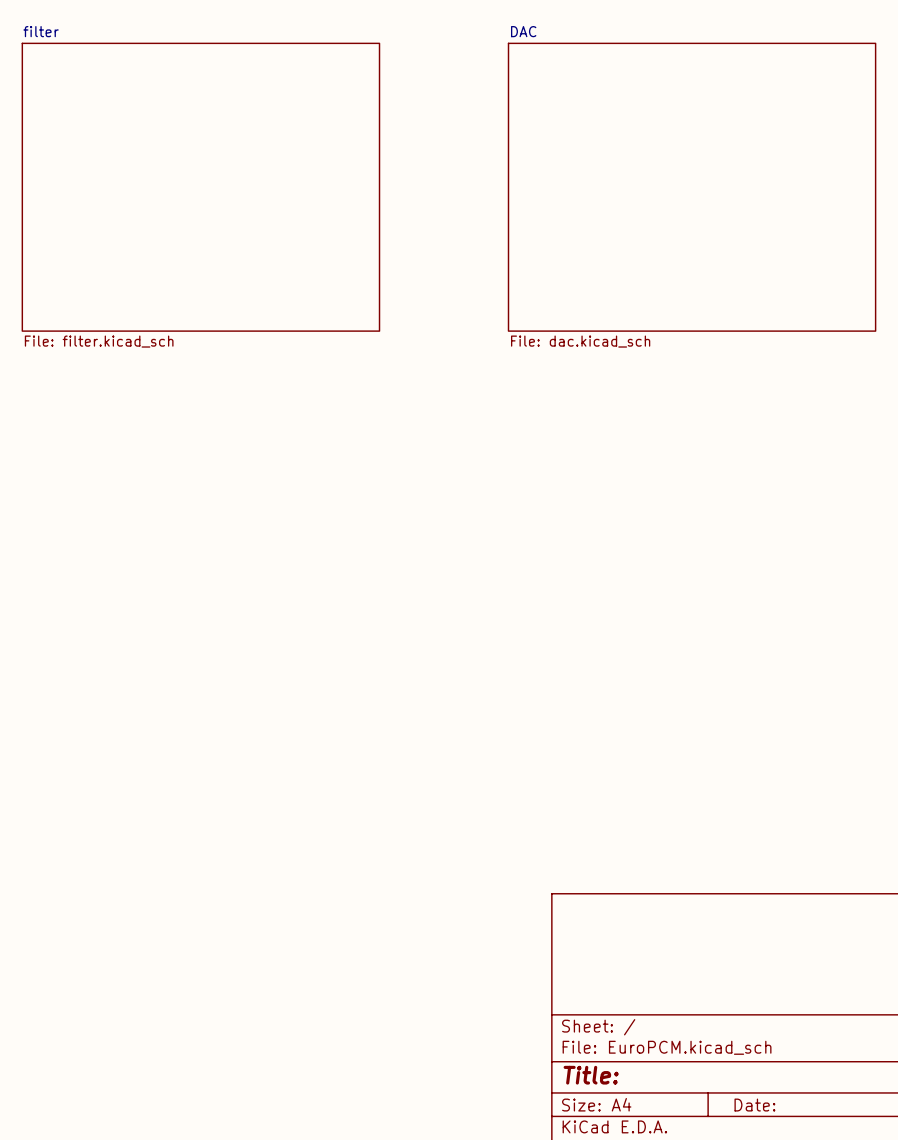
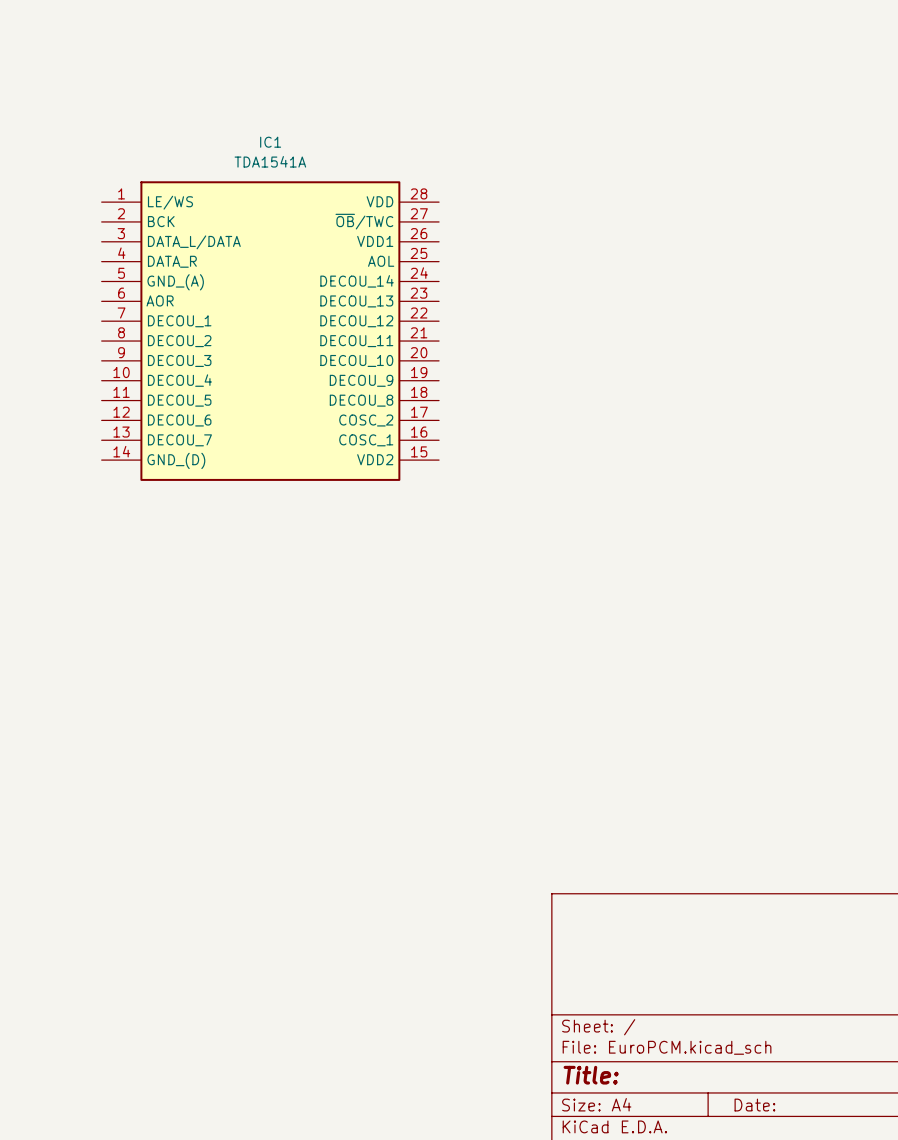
sheet filter: File: filter.kicad_sch (200, 187) -> none
sheet DAC: File: dac.kicad_sch (692, 187) -> none
IC1: none -> TDA1541A (270, 331)

